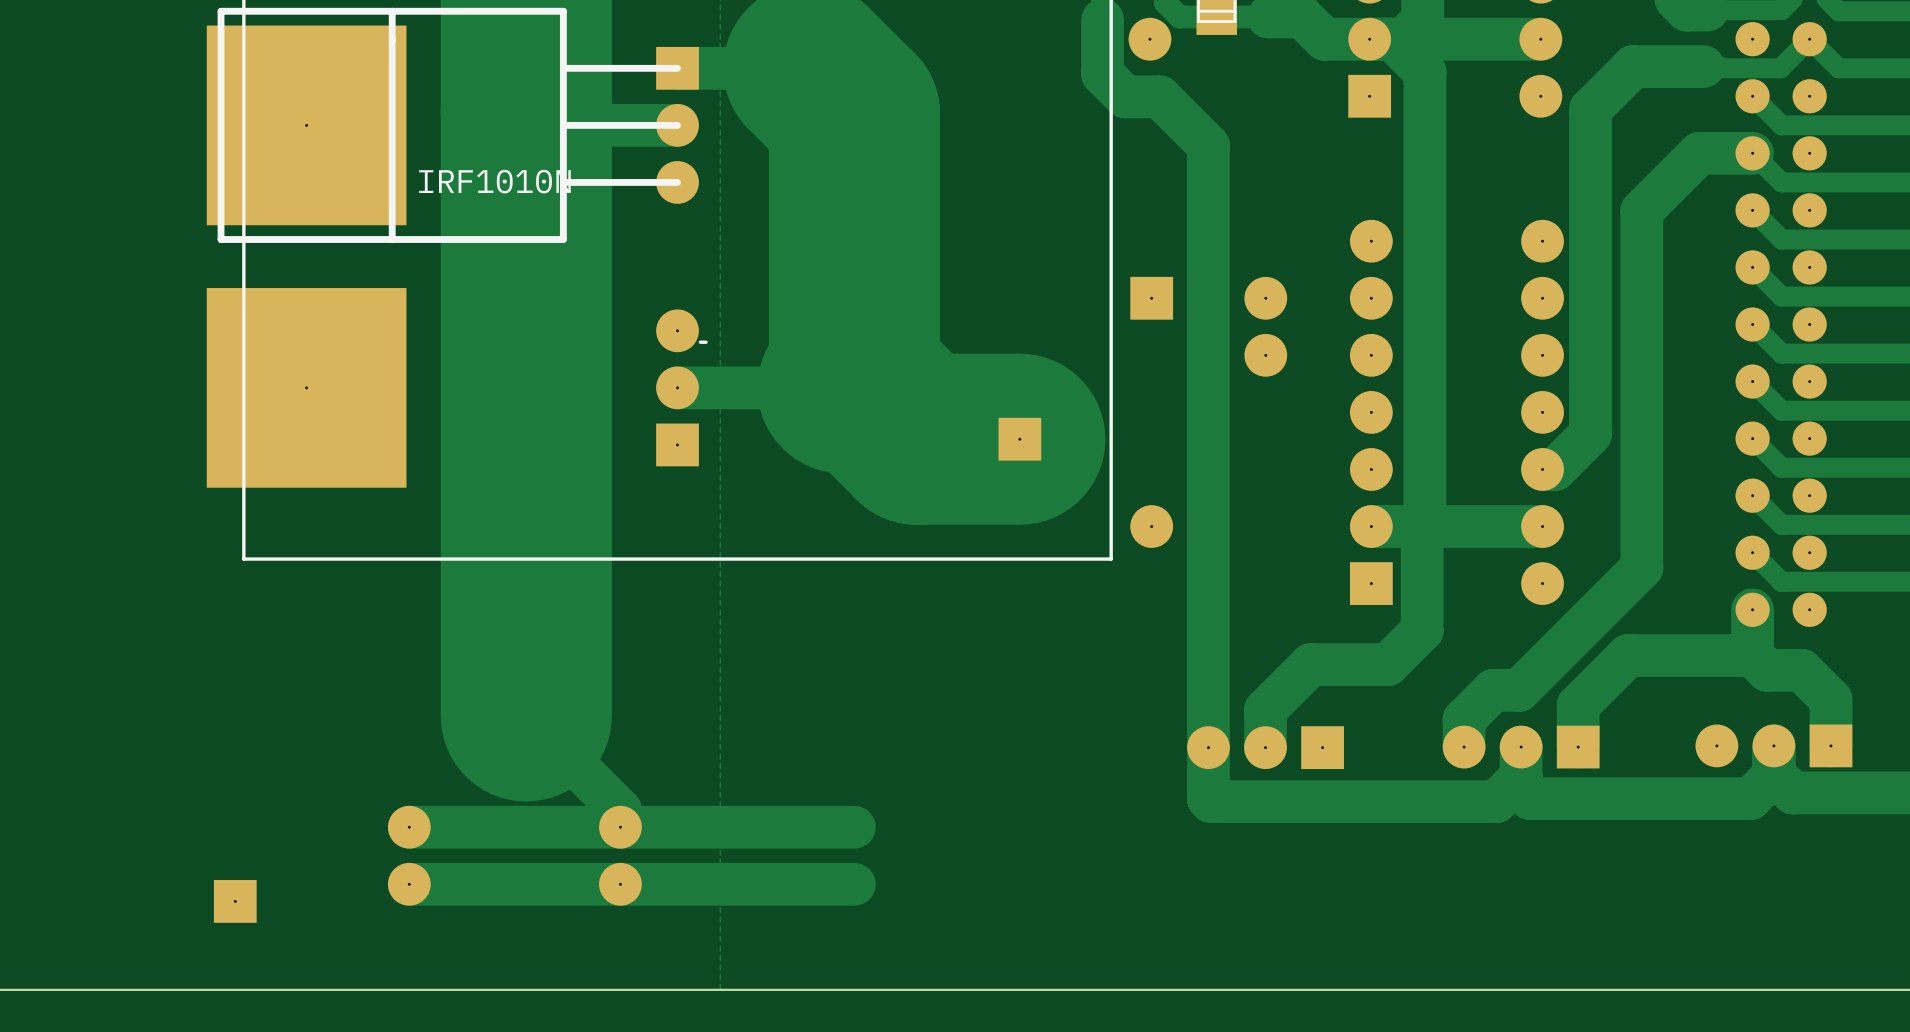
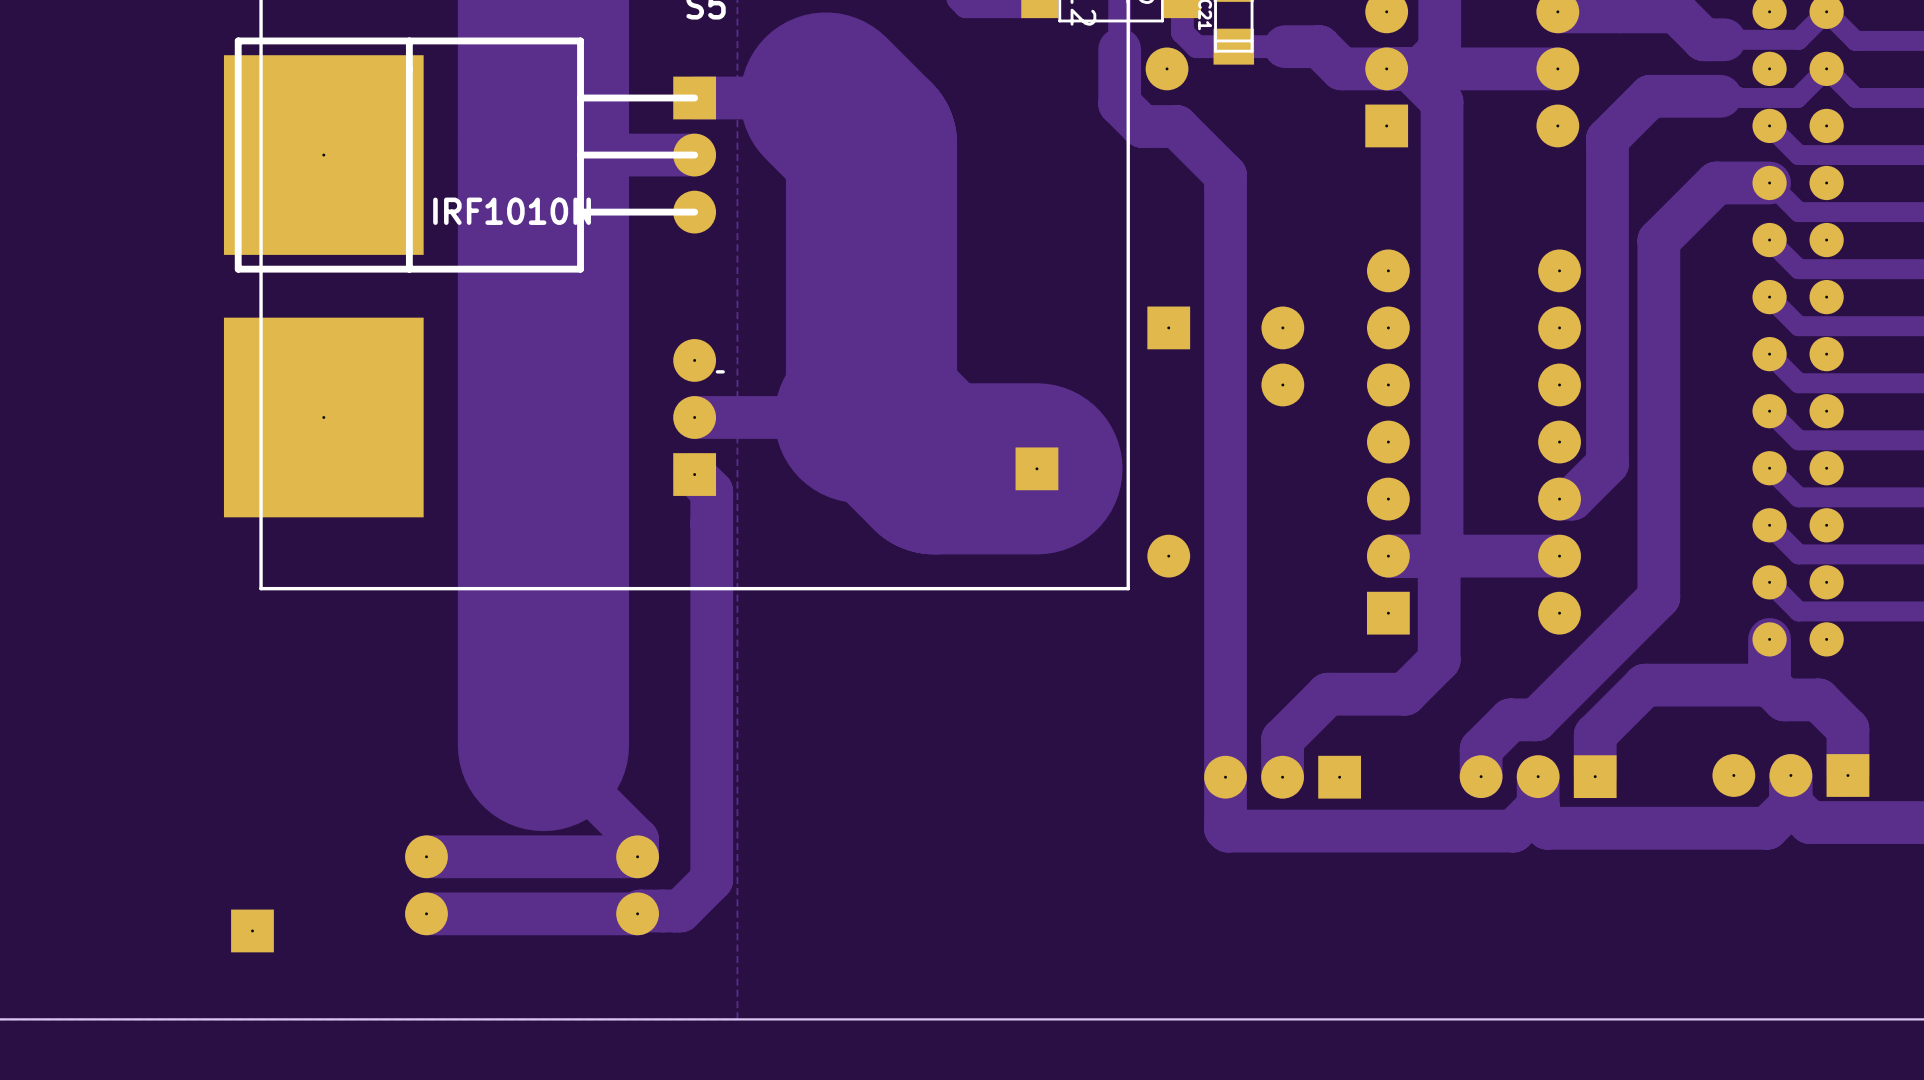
track: (854, 827) (620, 827) -> none
track: (854, 884) (620, 884) -> (694, 474) (711, 491) (711, 879) (680, 910) (640, 910) (637, 913)

